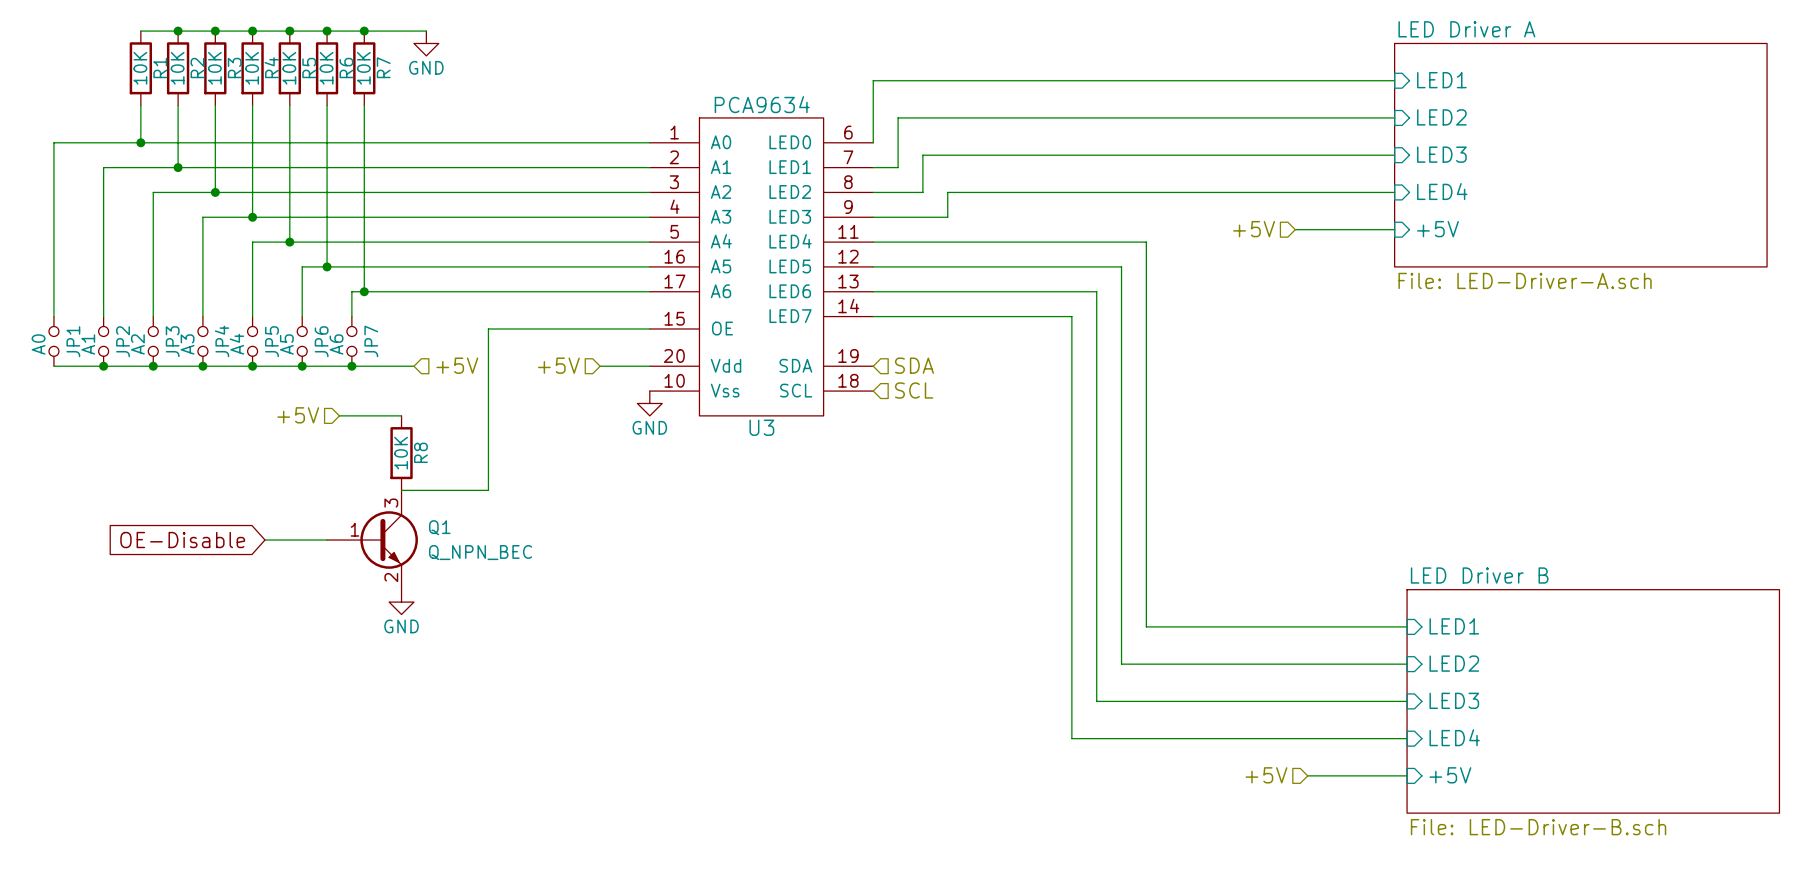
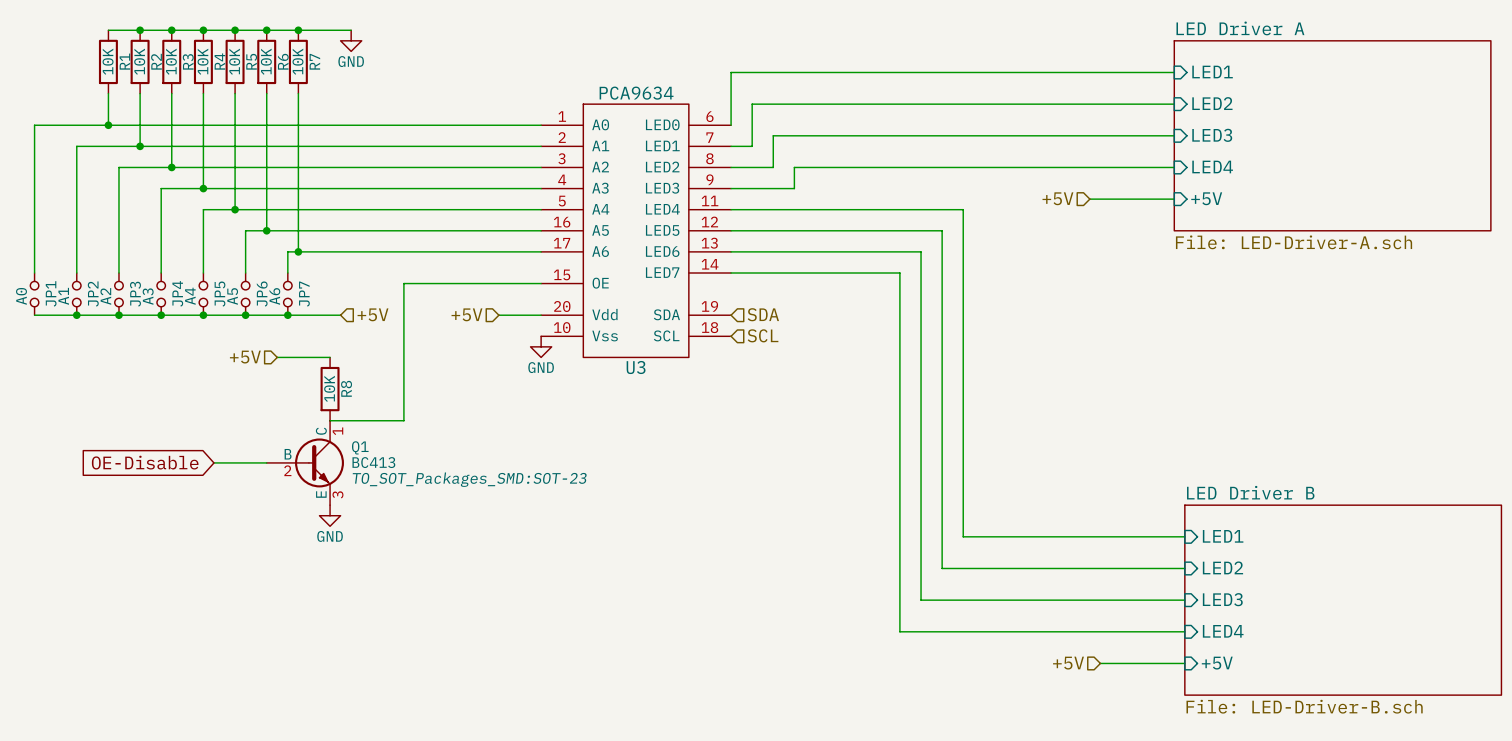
Q1 symbol: [327, 490, 418, 590] -> [266, 420, 344, 506]
Q1 value: Q_NPN_BEC (480, 552) -> BC413 (373, 462)
Q1 text: none -> TO_SOT_Packages_SMD:SOT-23 (469, 479)

